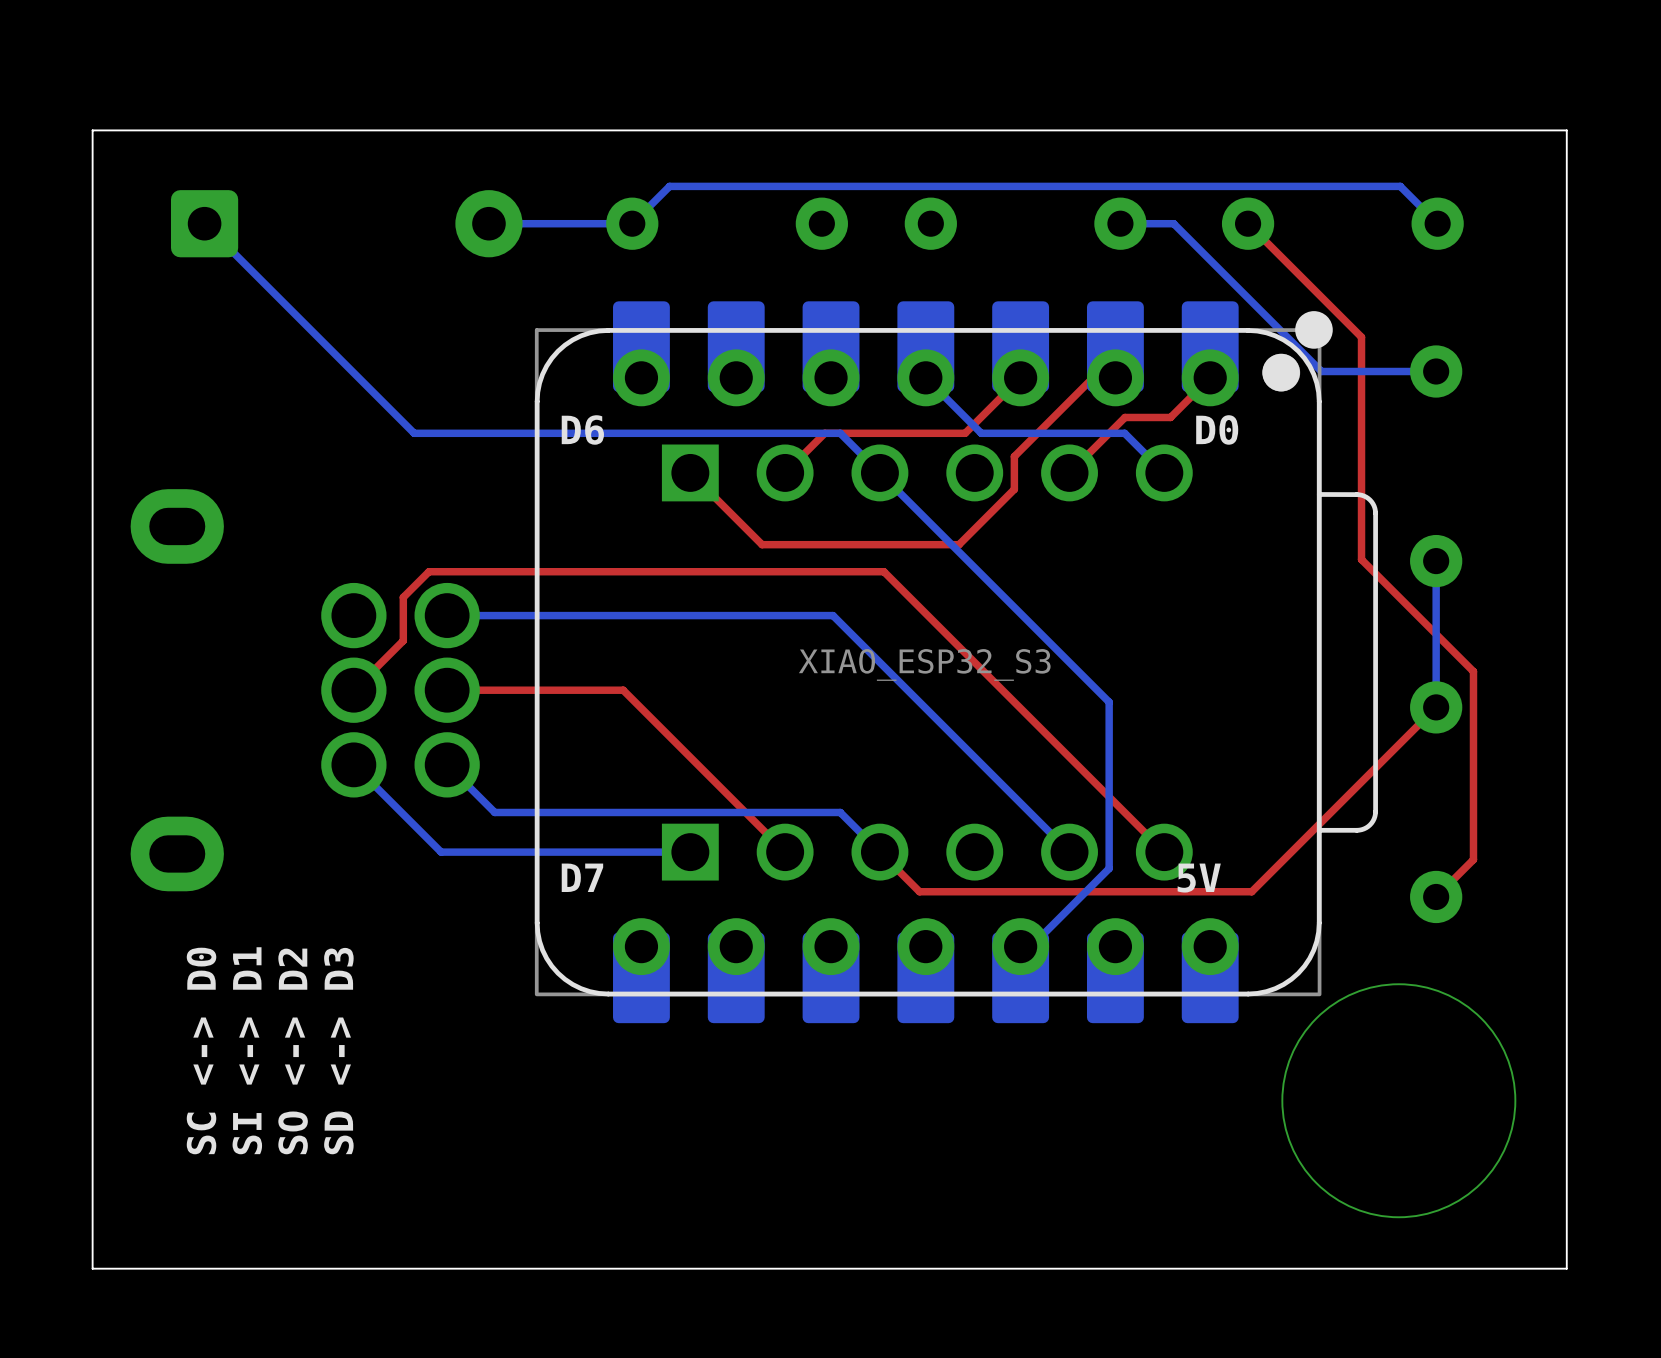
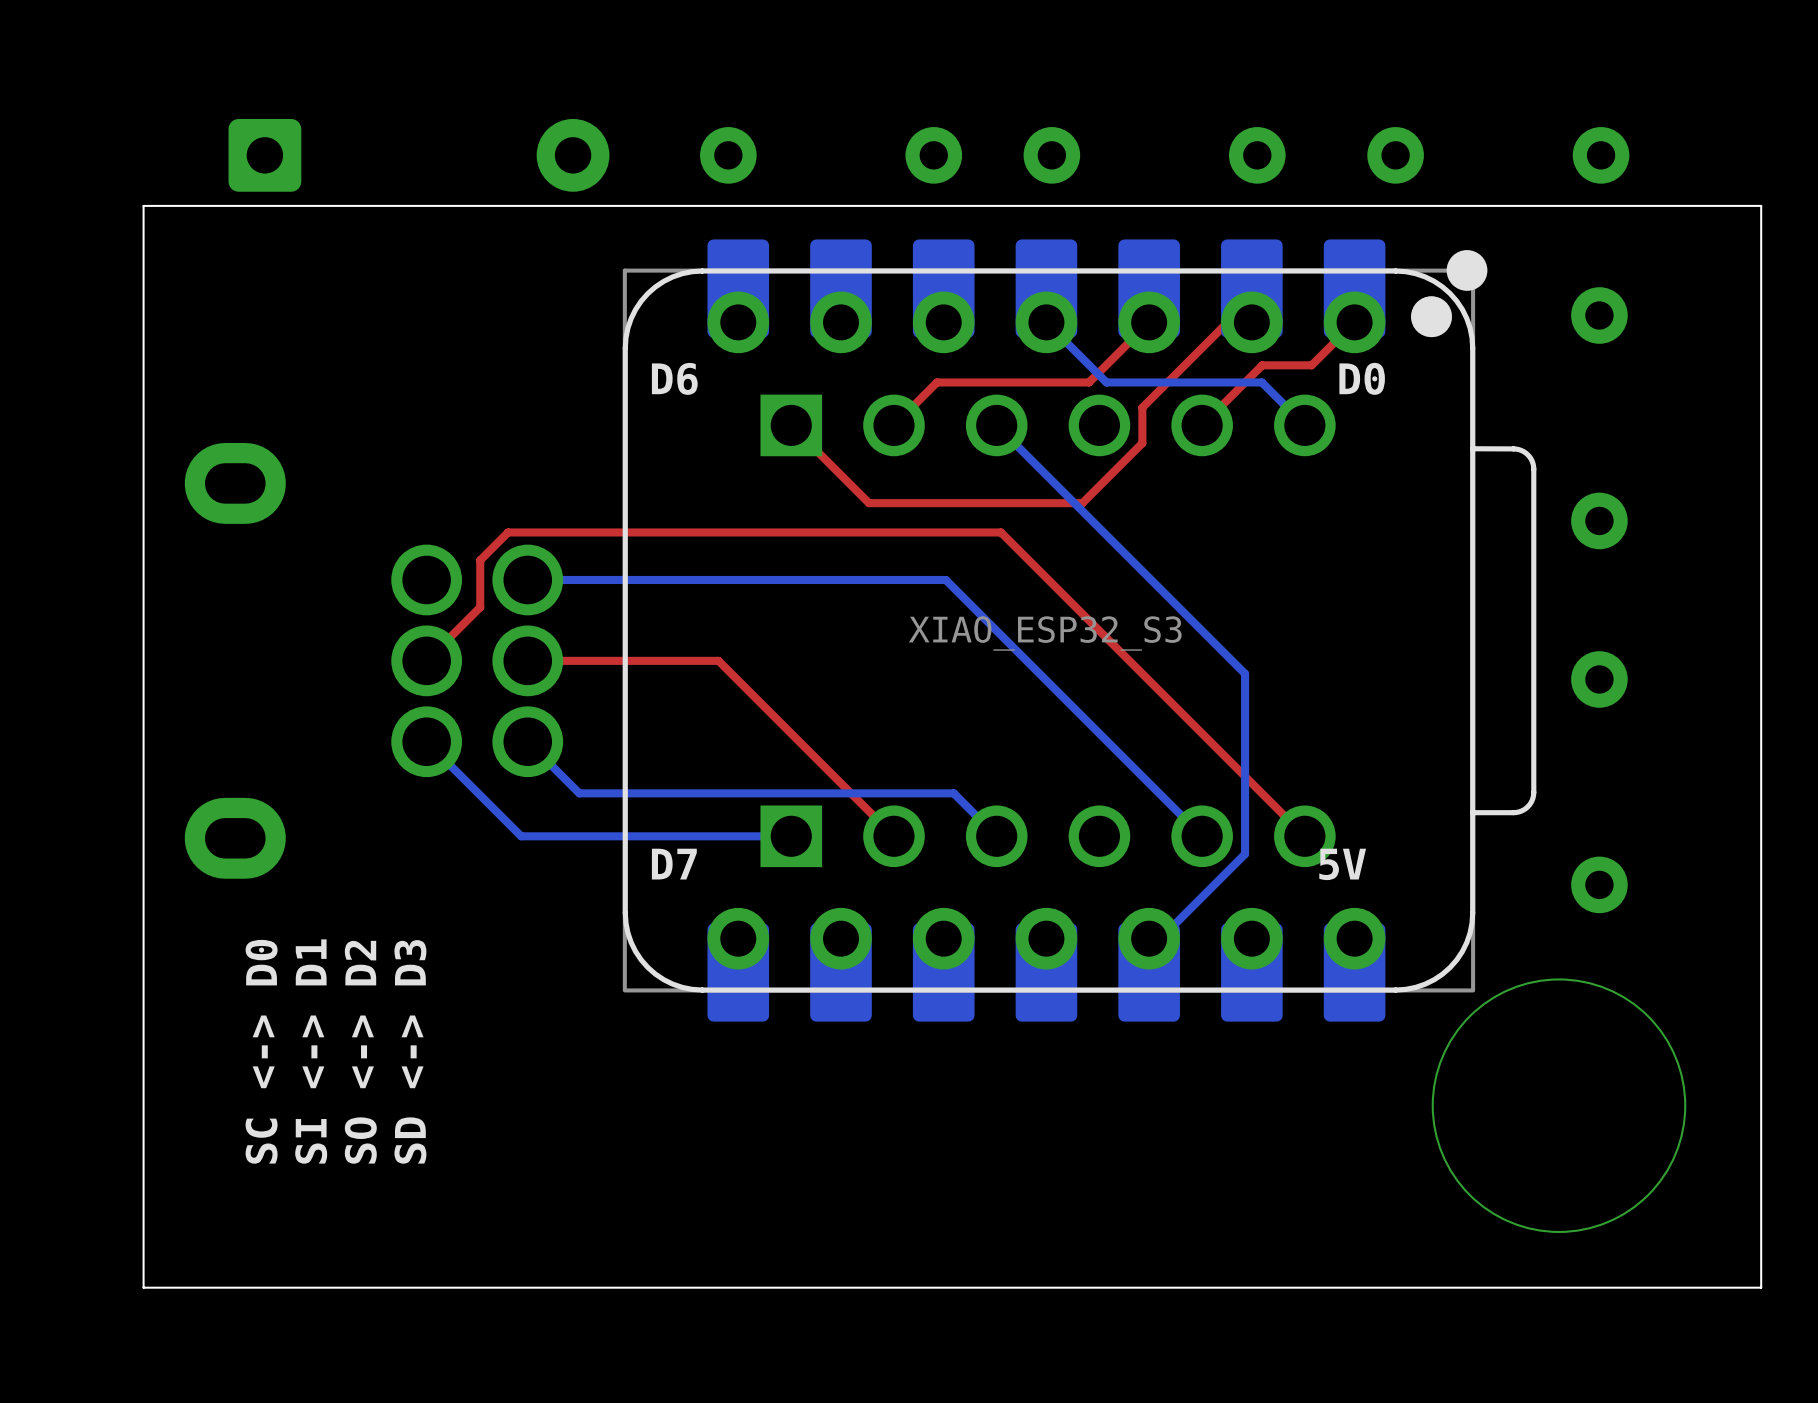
bottom track: (204, 223) (414, 433) (840, 433) (879, 472) -> none
bottom track: (1120, 223) (1173, 223) (1321, 371) (1436, 371) -> none
top track: (1248, 223) (1361, 337) (1361, 559) (1473, 671) (1473, 859) (1436, 896) -> none
bottom track: (1437, 223) (1400, 186) (669, 186) (632, 223) (488, 223) -> none
board edge: (92, 270) (92, 130) (1566, 130) (1566, 1268) -> (143, 205) (1761, 205) (1761, 1287) (1740, 1287)
bottom track: (1436, 561) (1436, 707) -> none
top track: (1436, 707) (1251, 891) (919, 891) (879, 852) -> none

